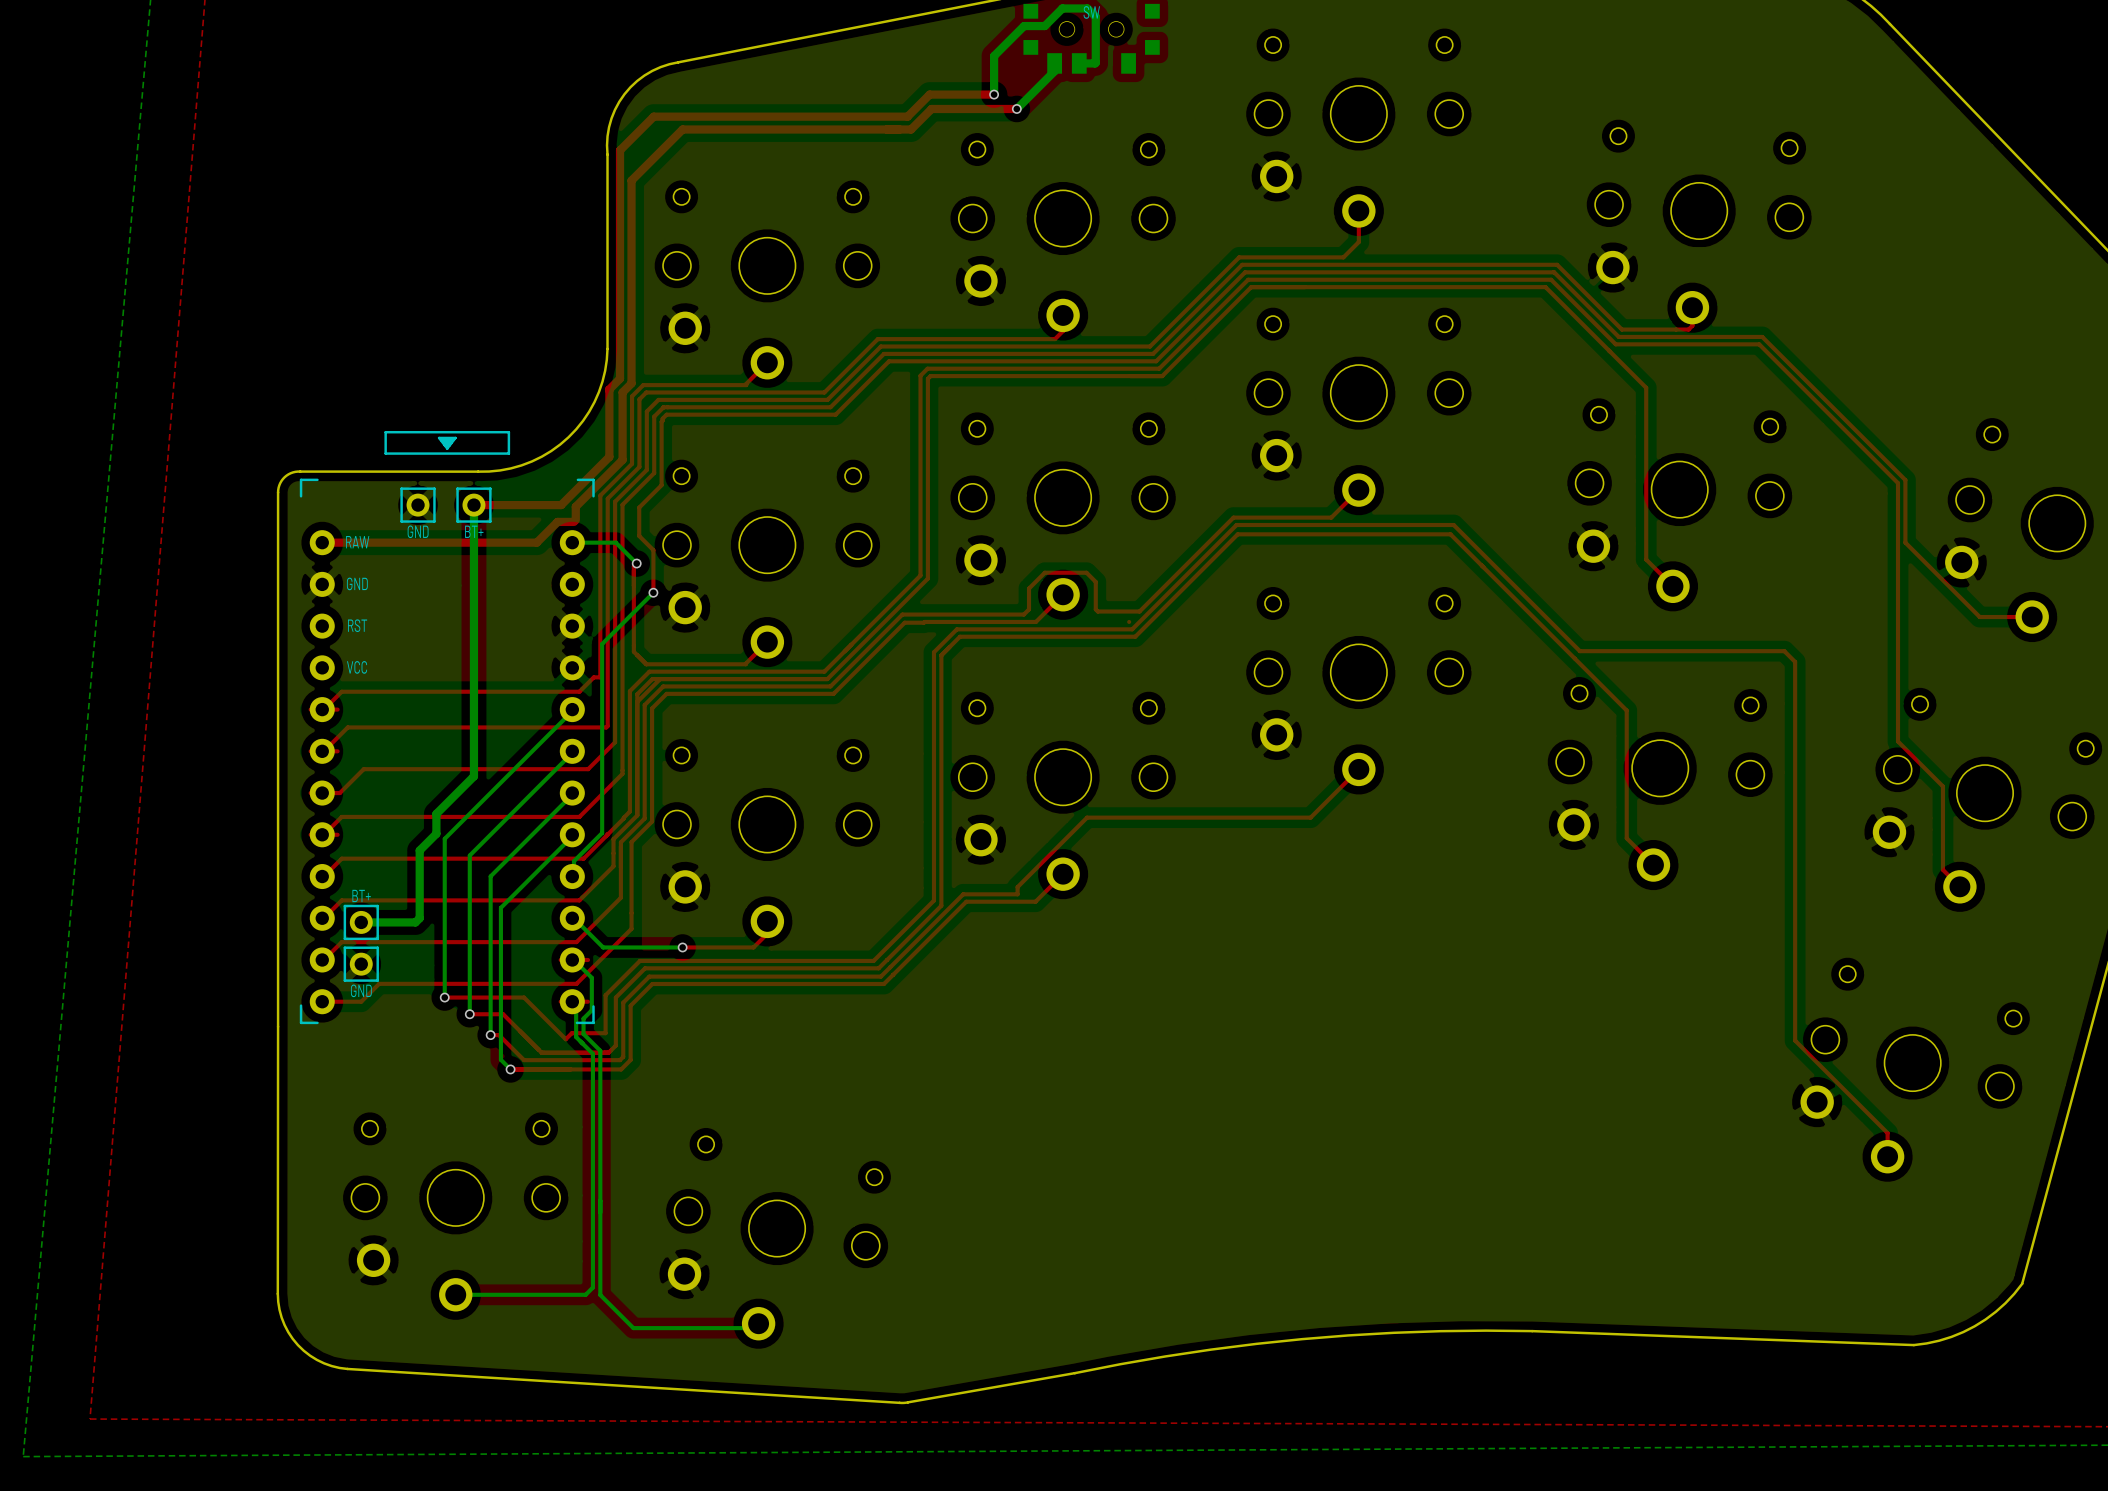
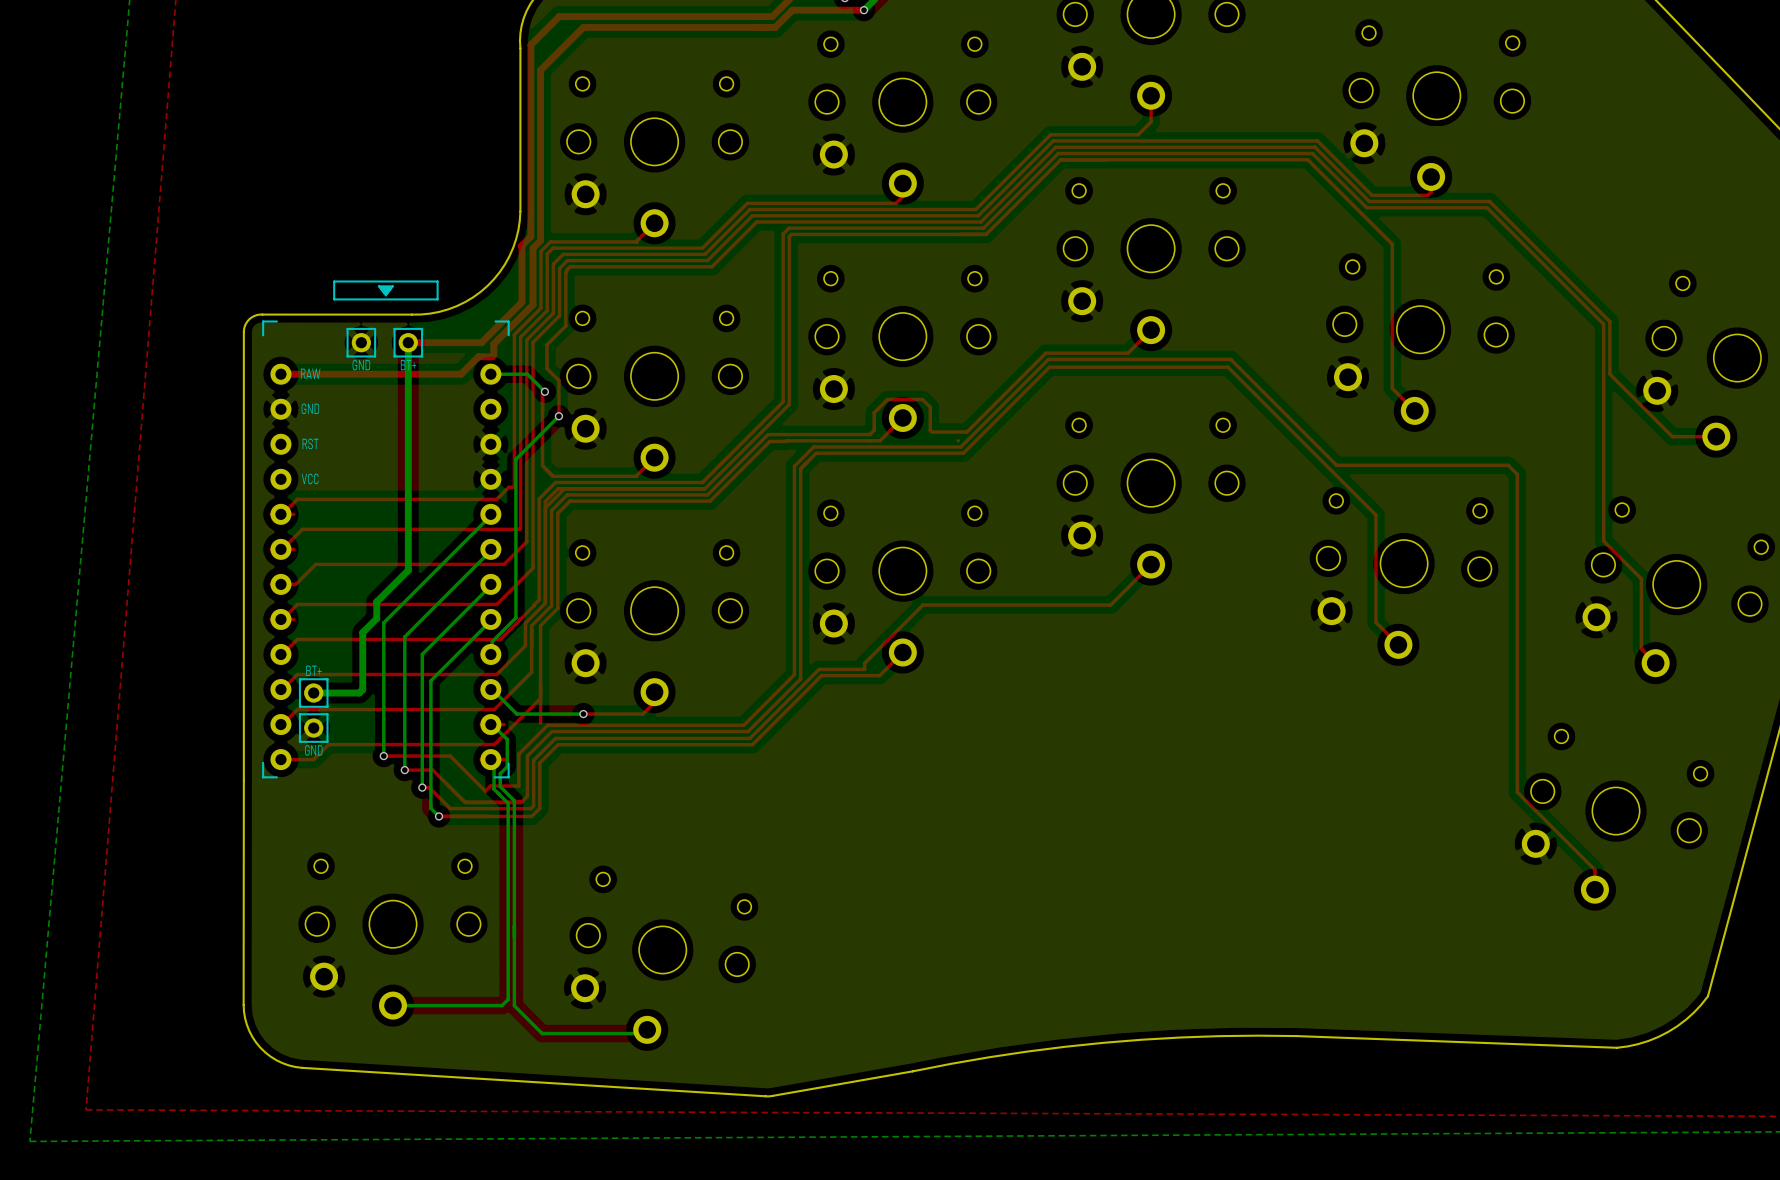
top track: none -> (540, 698) (540, 723)

